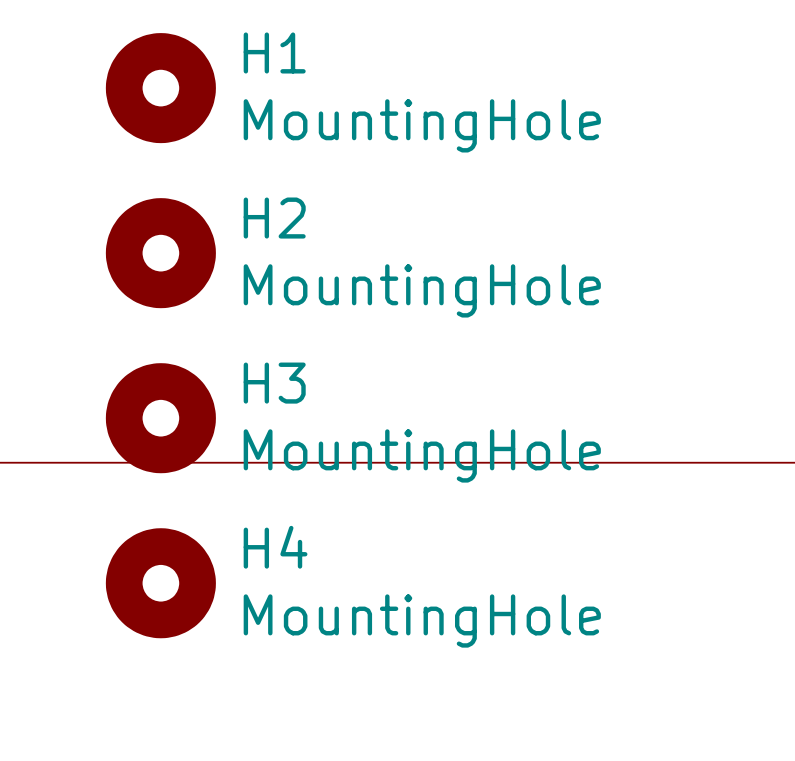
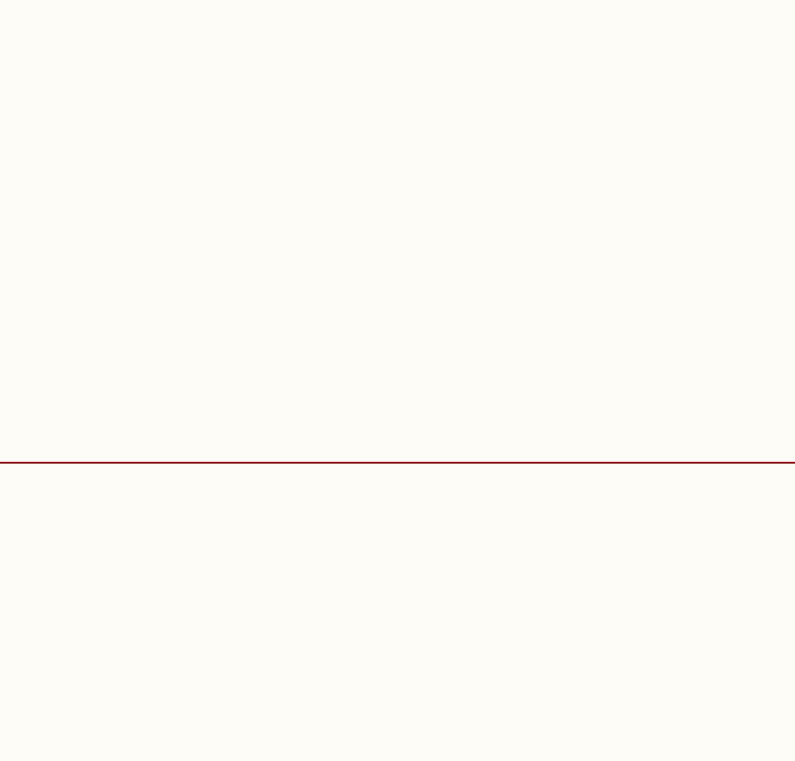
H1: MountingHole (160, 88) -> none
H2: MountingHole (160, 253) -> none
H3: MountingHole (160, 418) -> none
H4: MountingHole (160, 583) -> none

